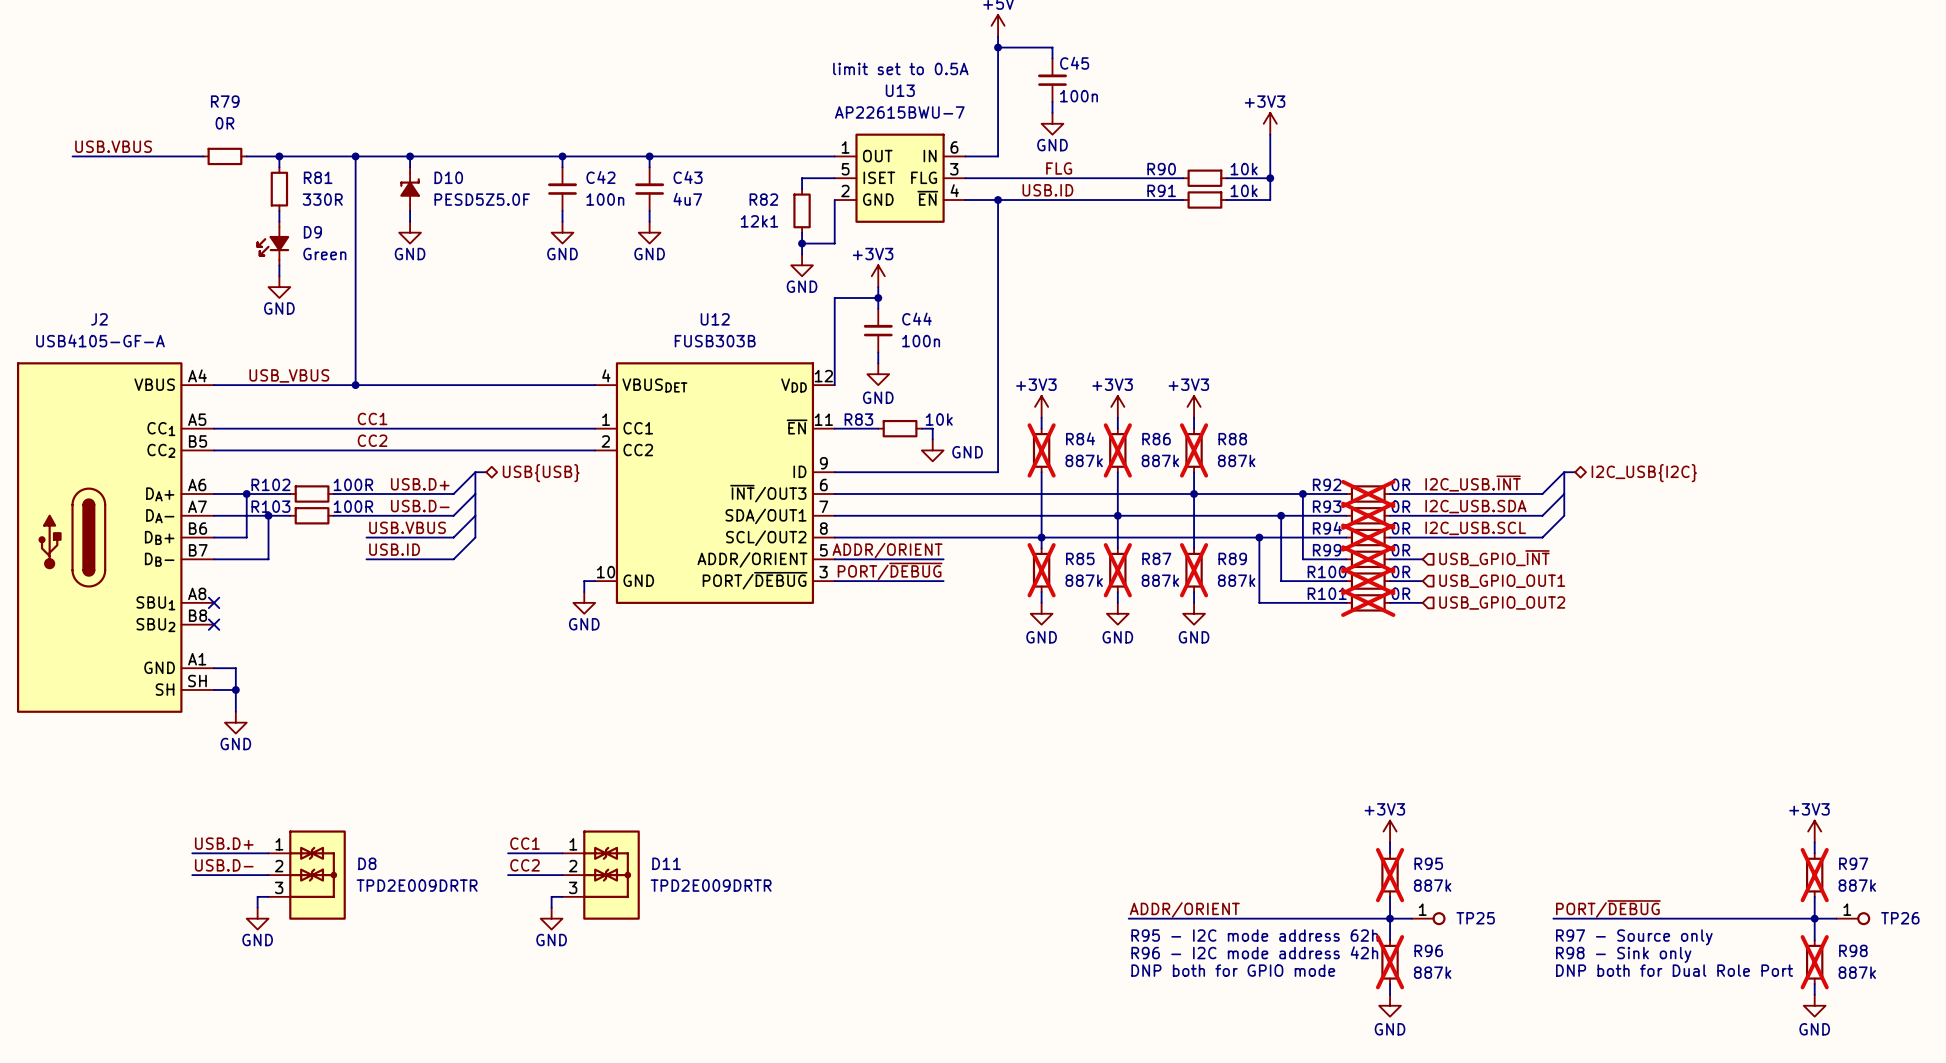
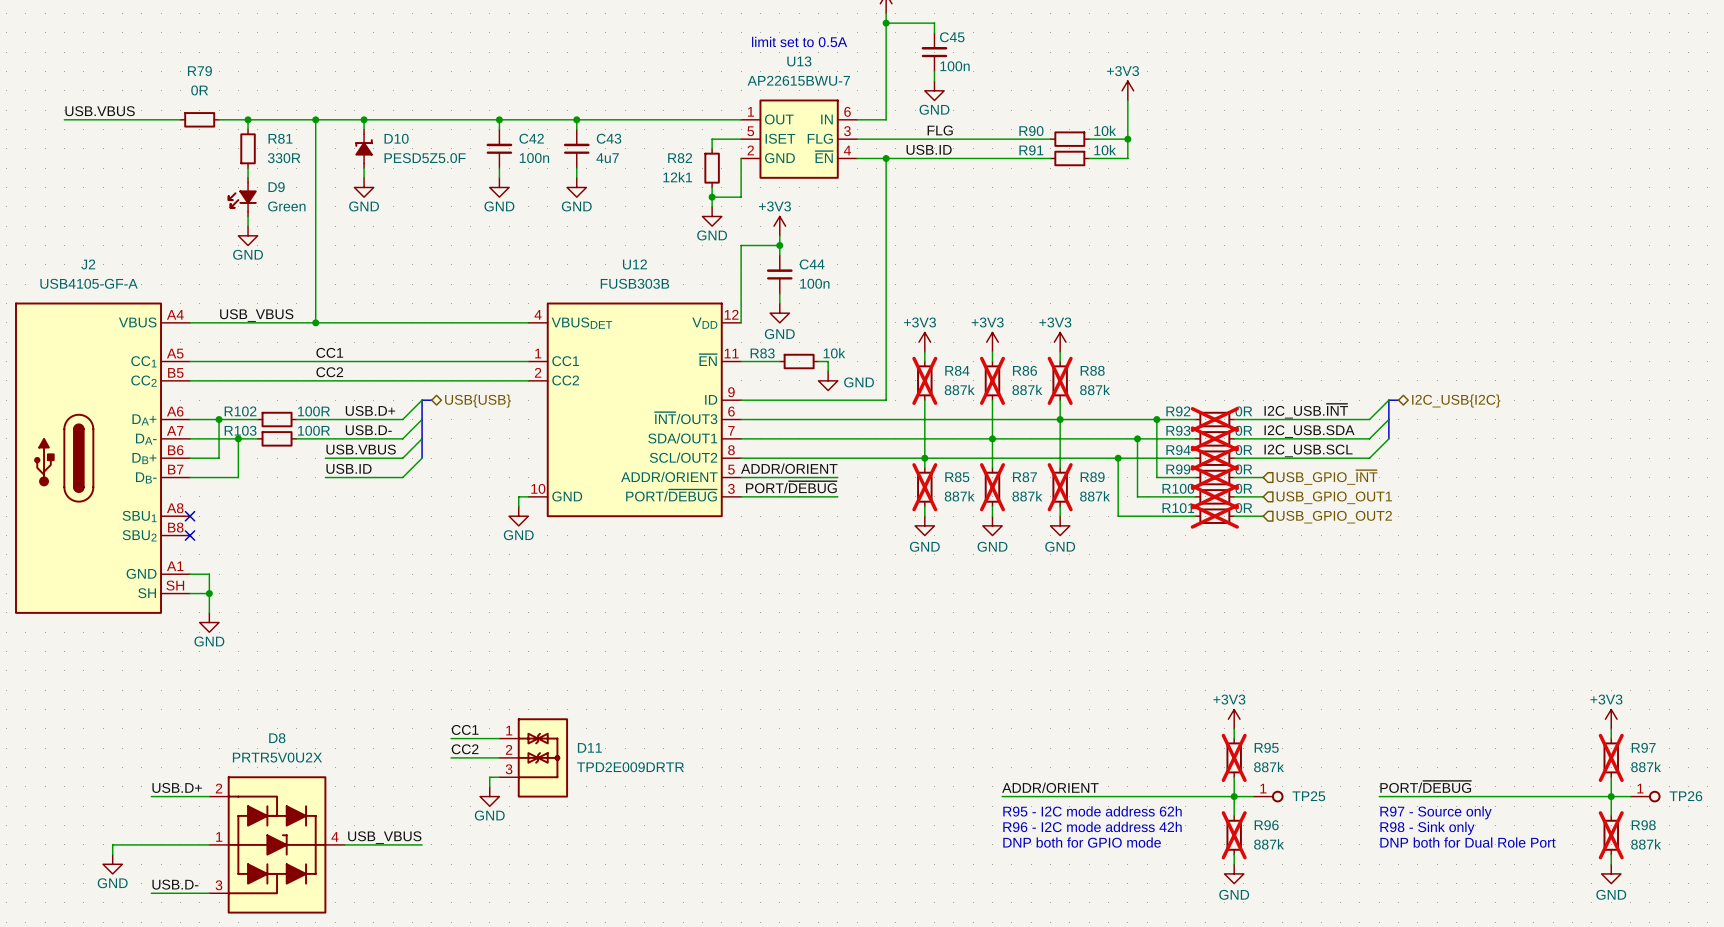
D8 symbol: [268, 830, 346, 920] -> [209, 776, 345, 914]
label position: USB.D+ (224, 843) -> USB.D+ (177, 787)
wire: (192, 853) (268, 853) -> none
D8 name position: D8 (367, 863) -> D8 (277, 738)
label position: USB.D- (224, 865) -> USB.D- (175, 884)
wire: (192, 875) (268, 875) -> none
D8 text: TPD2E009DRTR (417, 885) -> PRTR5V0U2X (277, 757)
wire: none -> (151, 796) (209, 796)
power symbol position: GND (257, 918) -> GND (112, 864)
label: none -> USB_VBUS (384, 837)
wire: none -> (209, 844) (112, 844) (112, 854)
wire: none -> (344, 844) (422, 844)
wire: none -> (151, 893) (209, 893)

